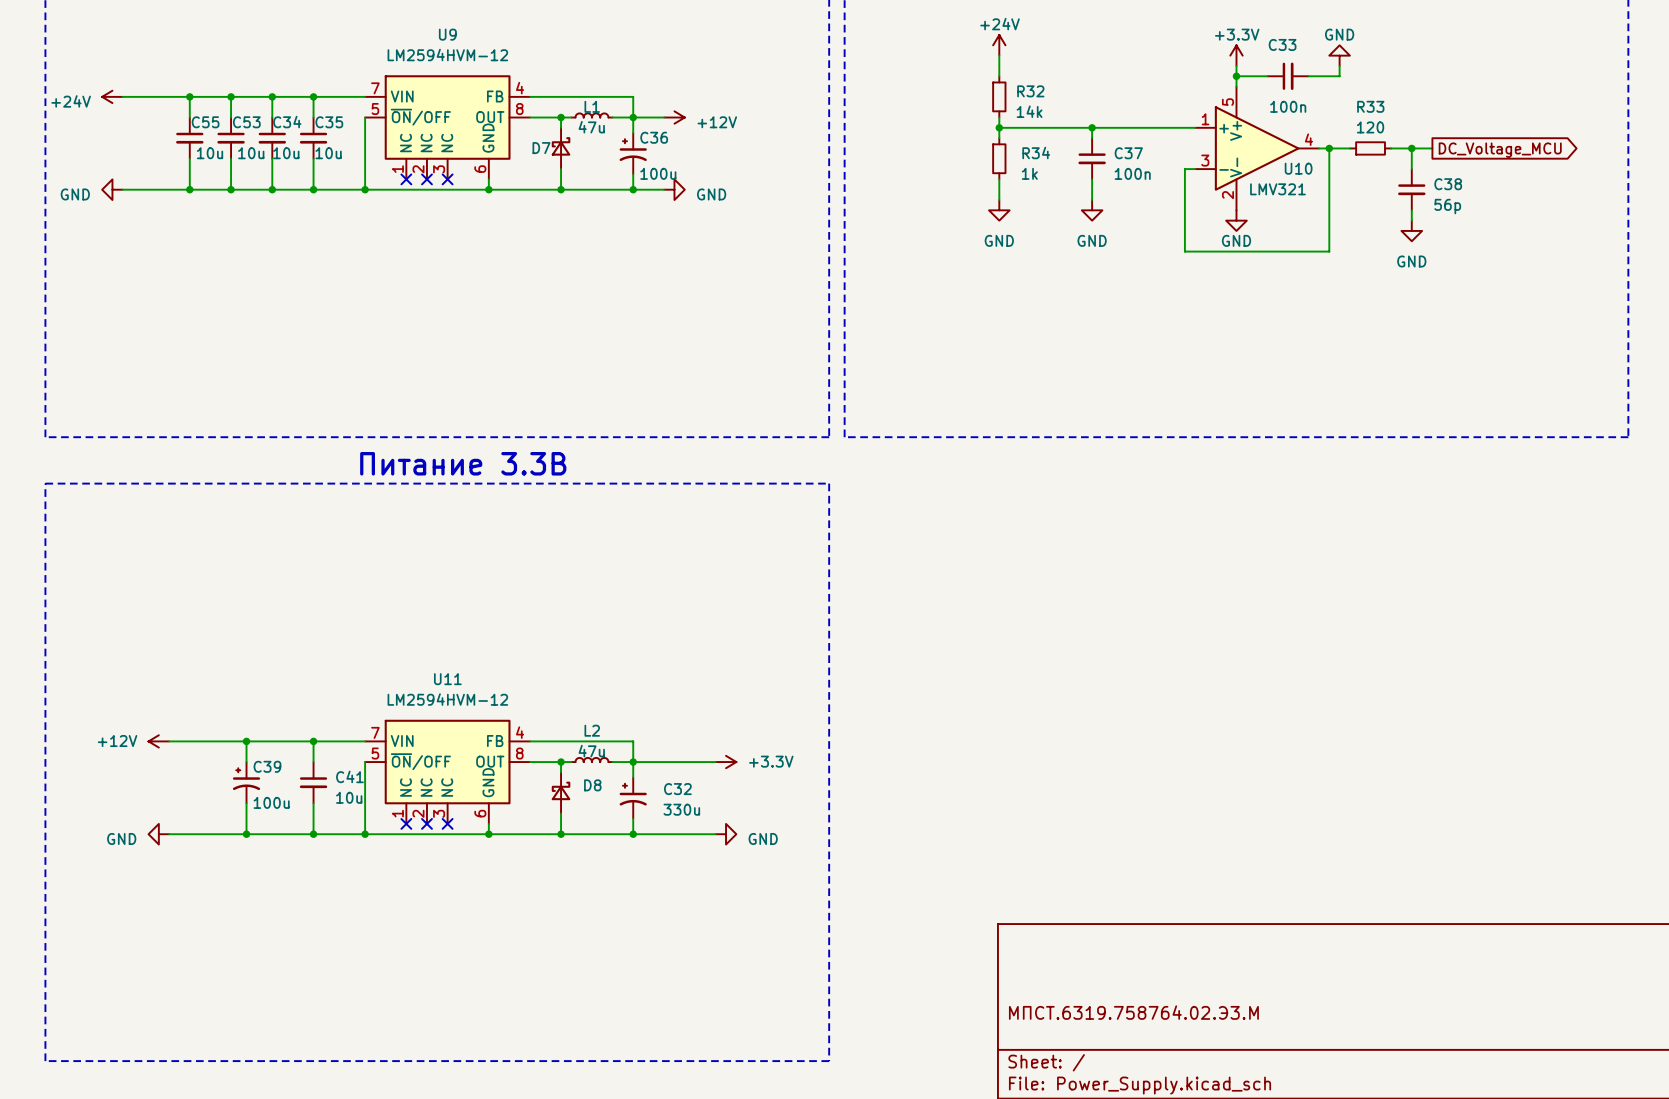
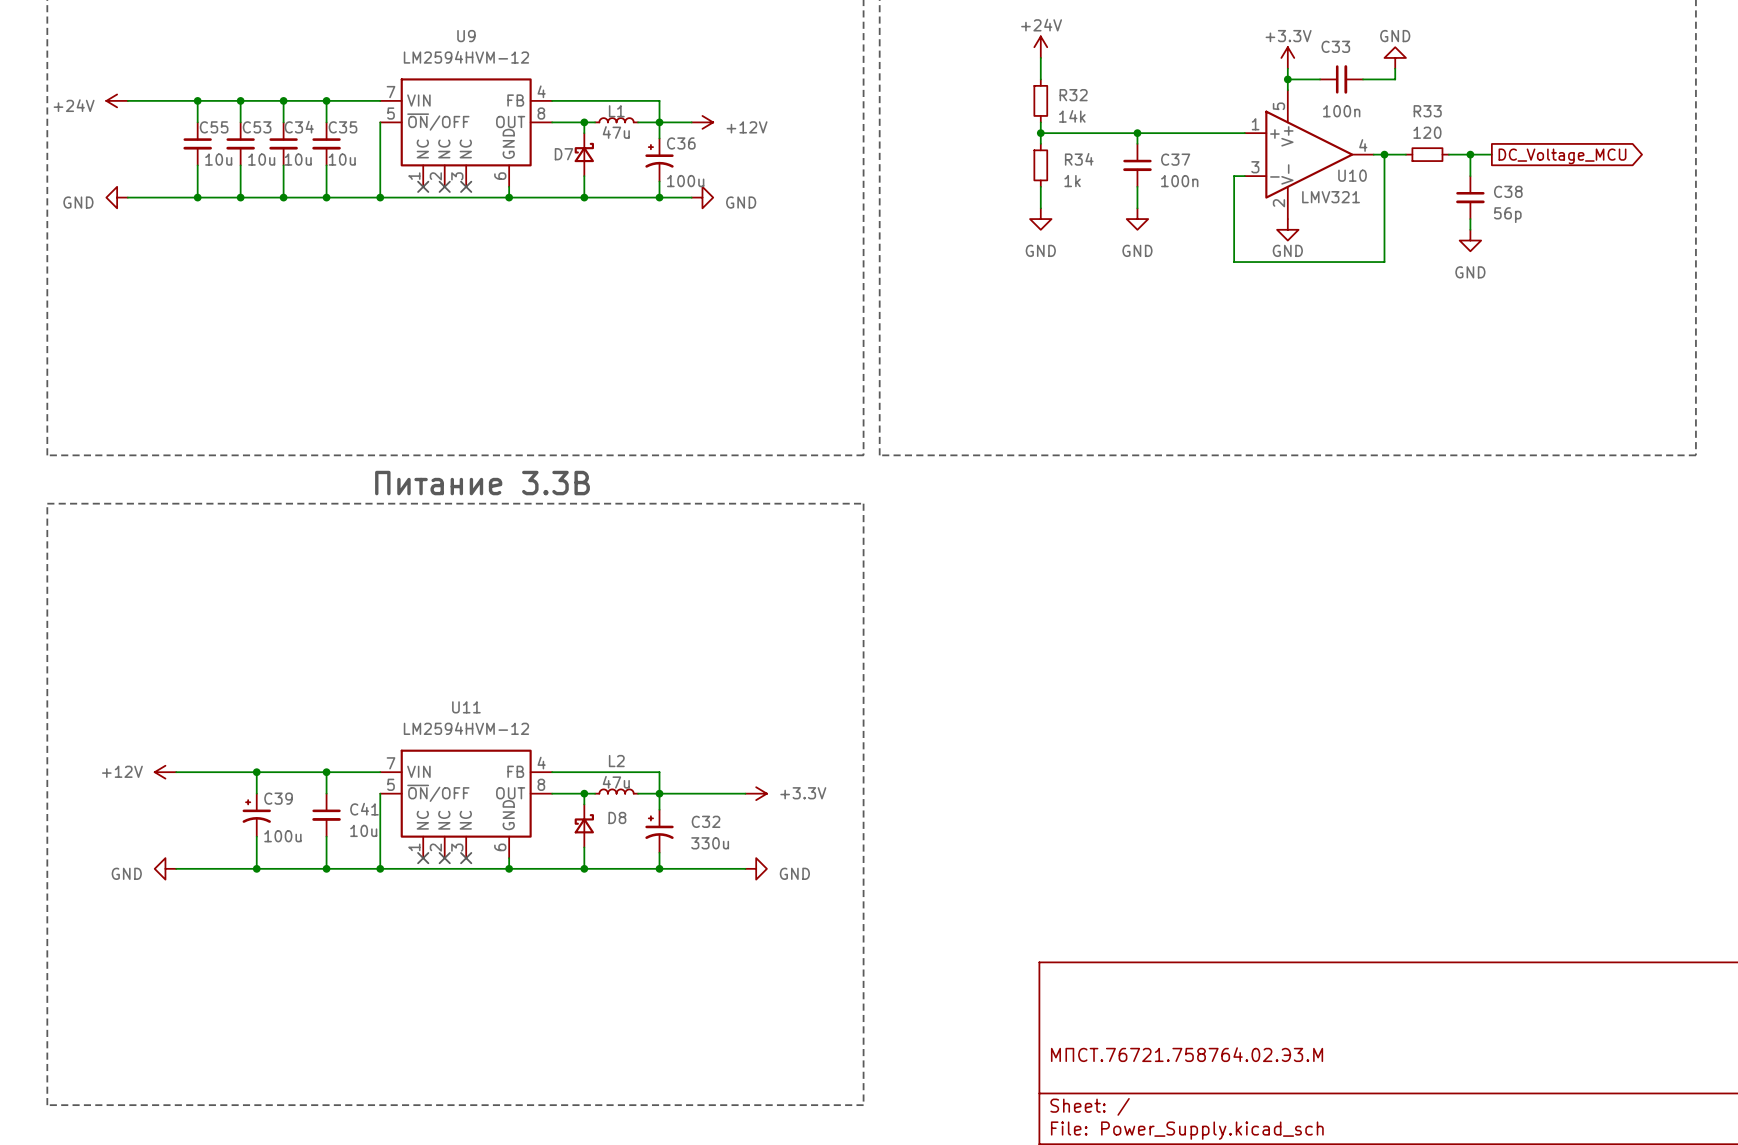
title block: МПСТ.6319.758764.02.Э3.М (1133, 1012) -> МПСТ.76721.758764.02.Э3.М (1187, 1054)

